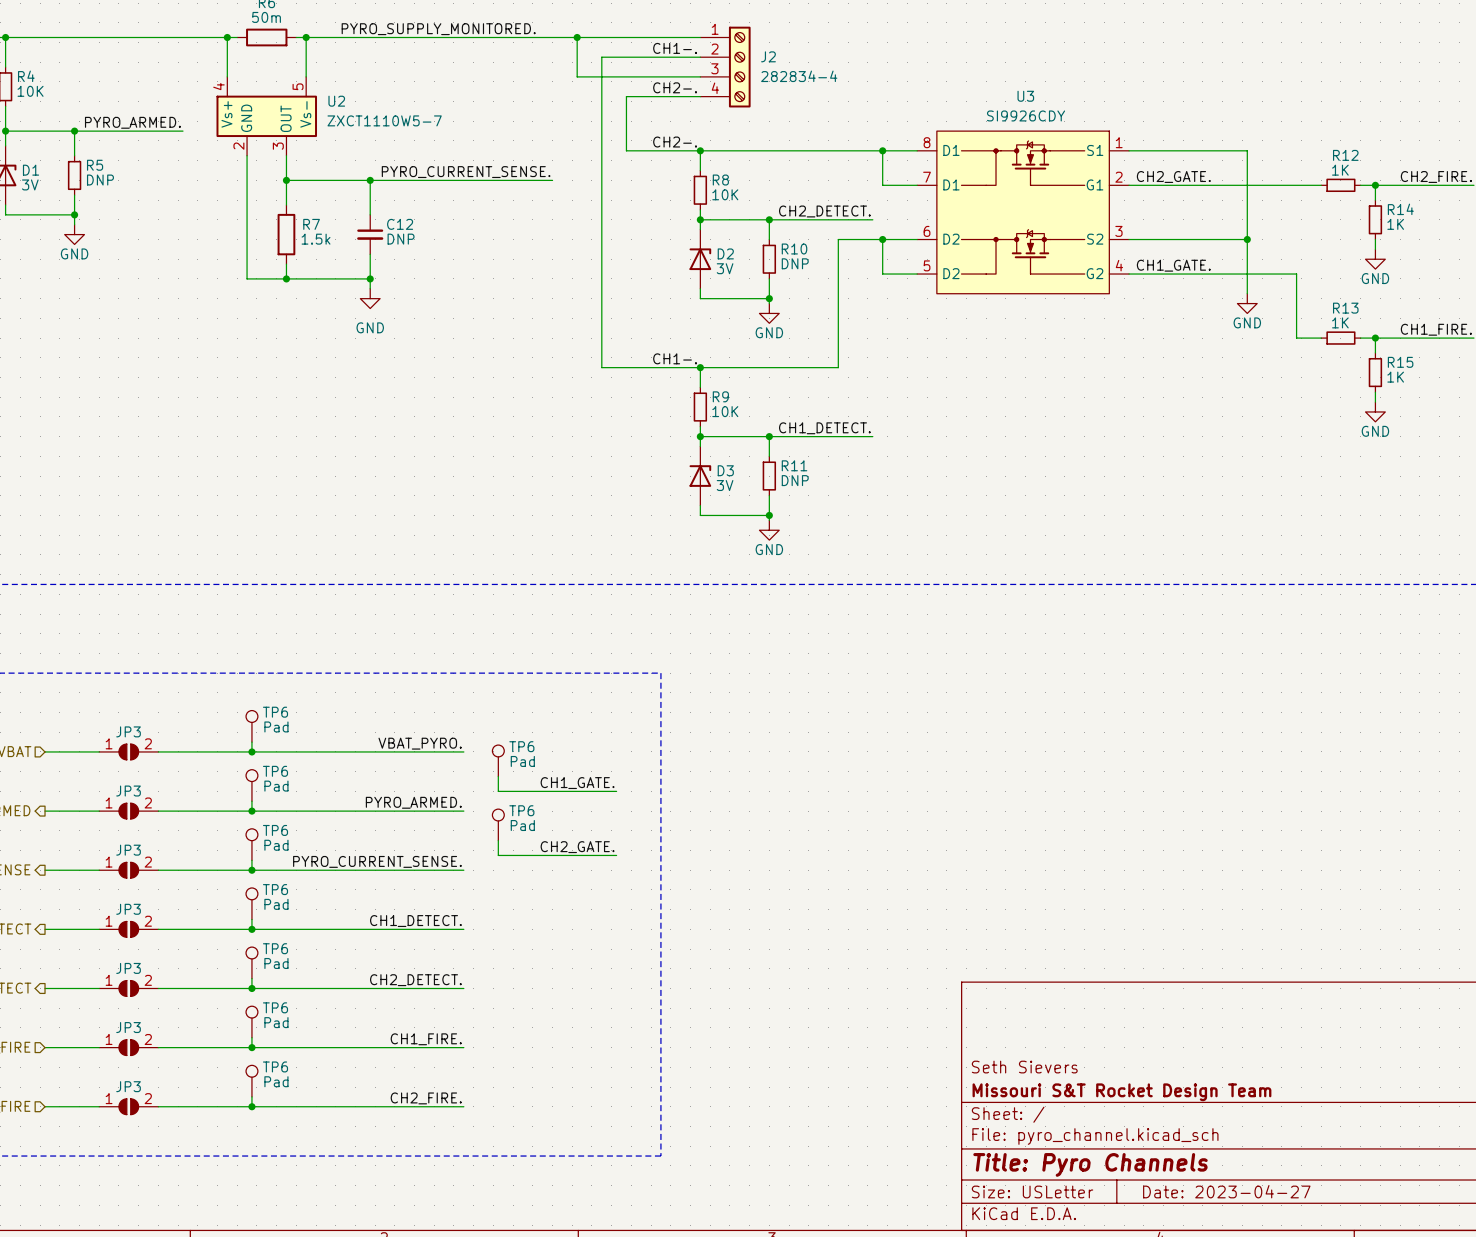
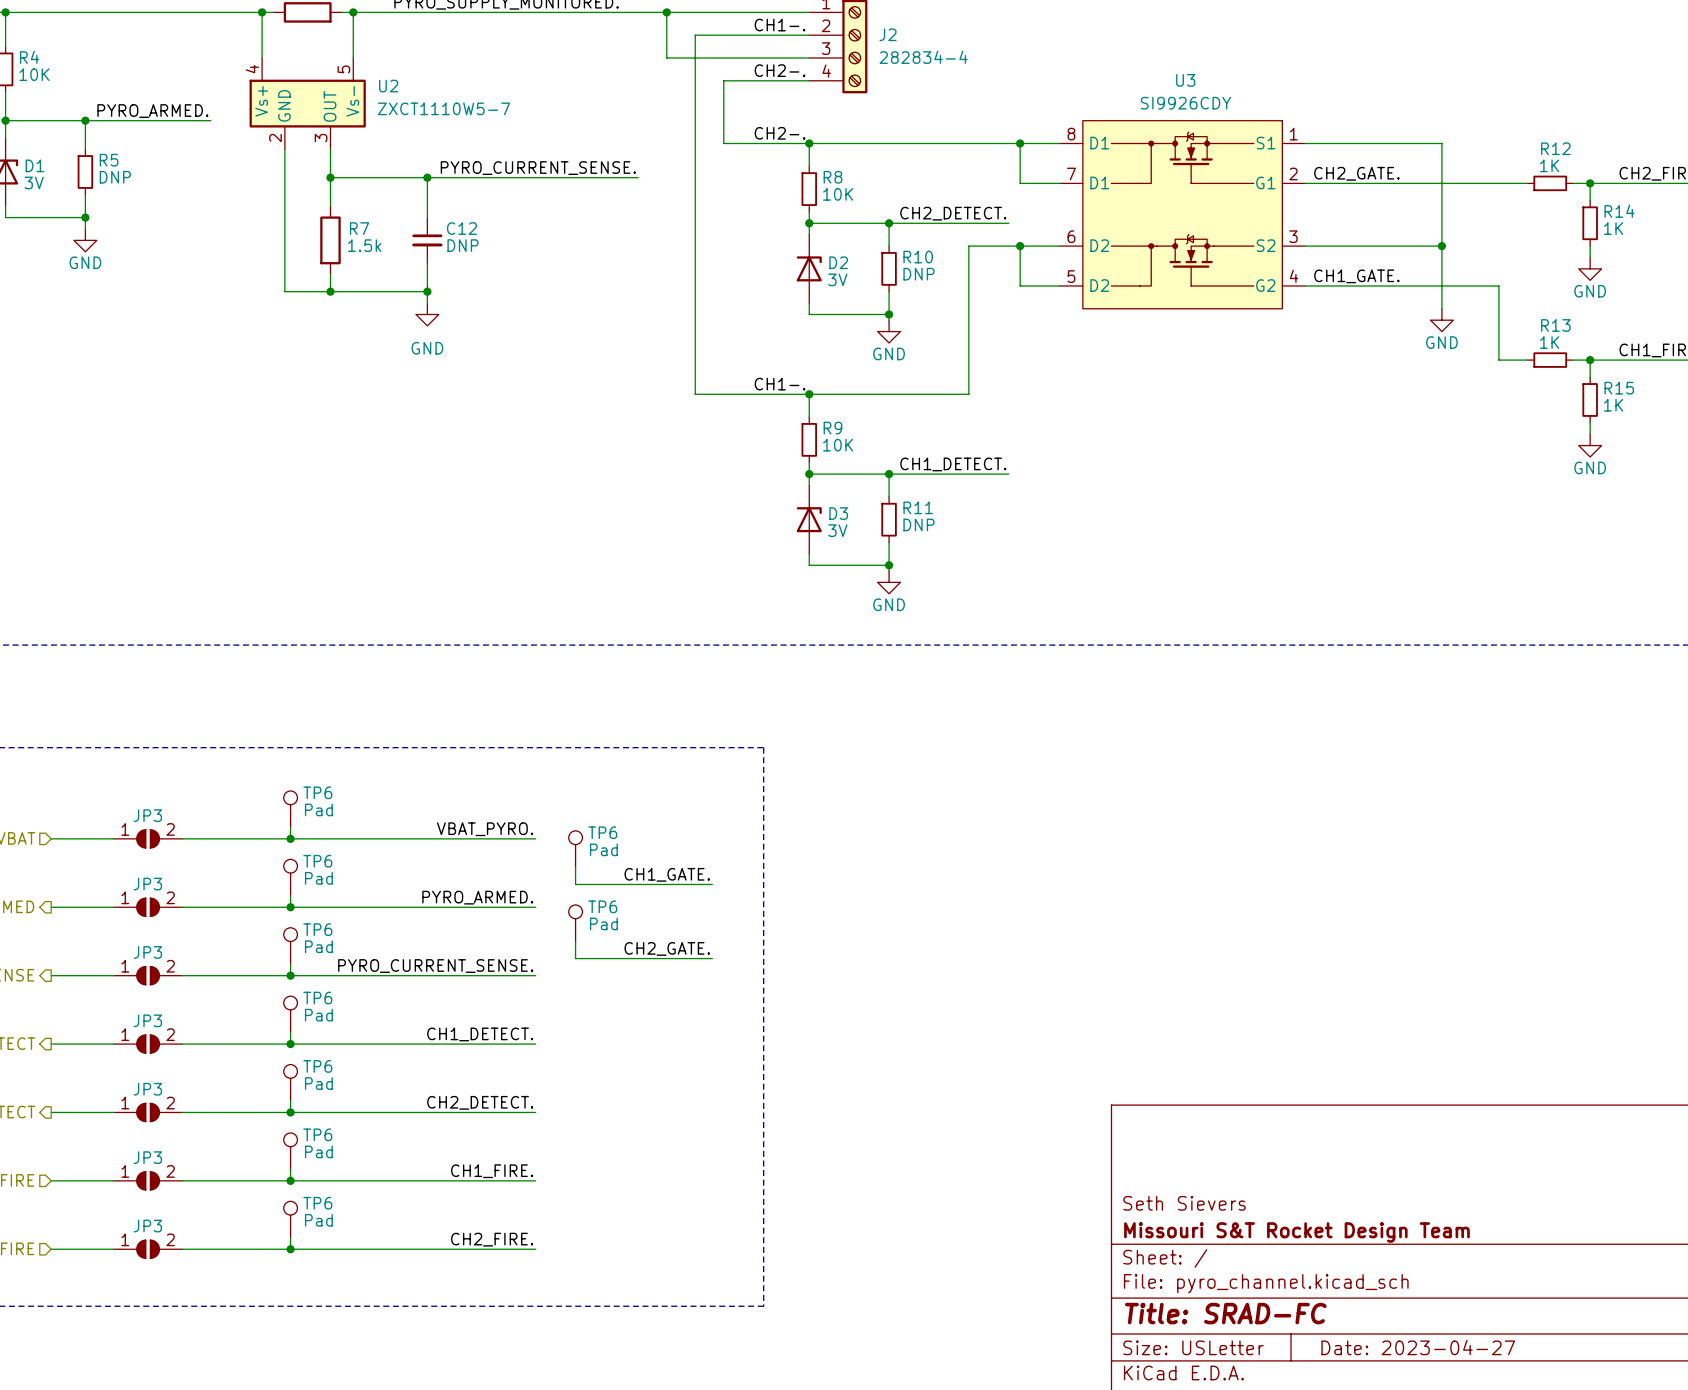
title block: Title: Pyro Channels (1090, 1164) -> Title: SRAD-FC (1225, 1313)

